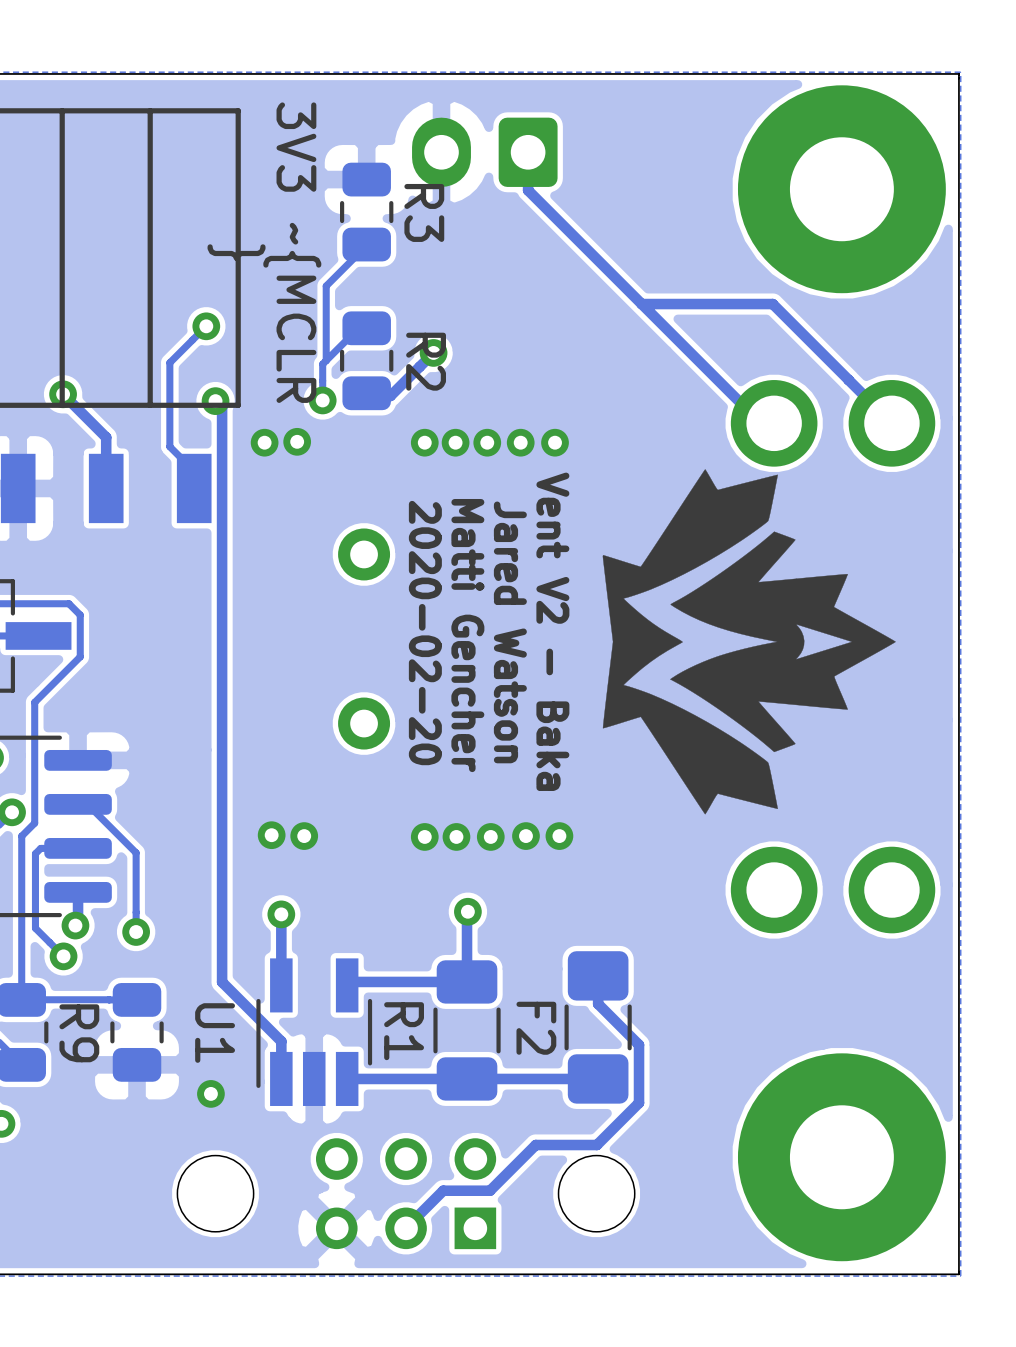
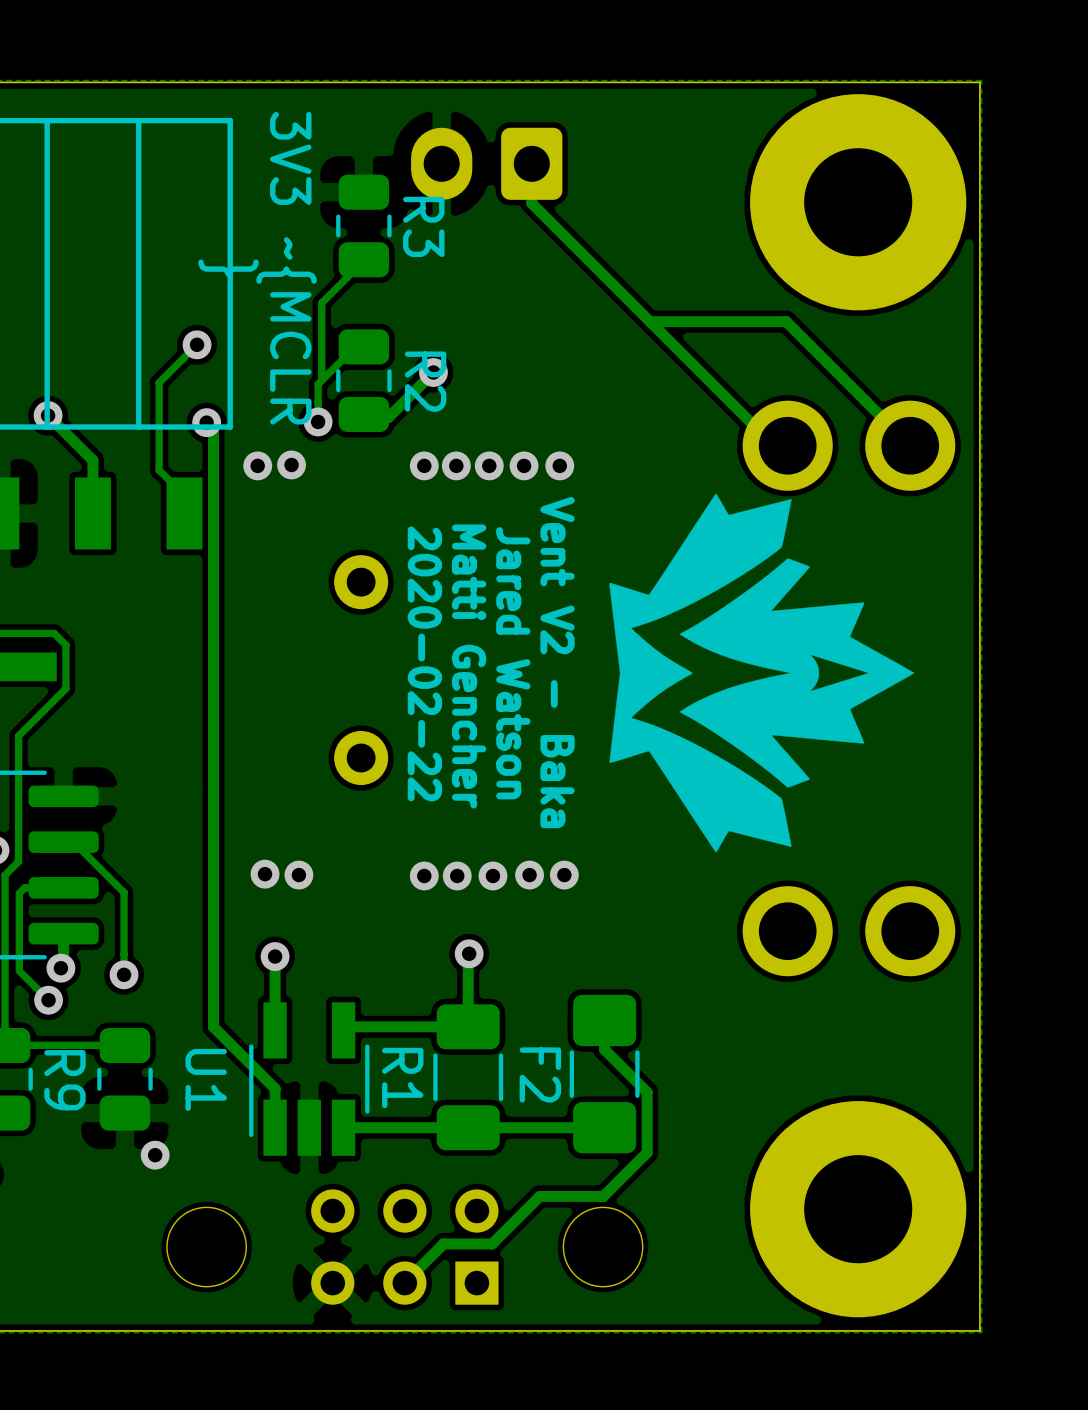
text: 2020-02-20 (425, 633) -> 2020-02-22 (424, 663)
via position: (210, 1093) -> (155, 1155)

